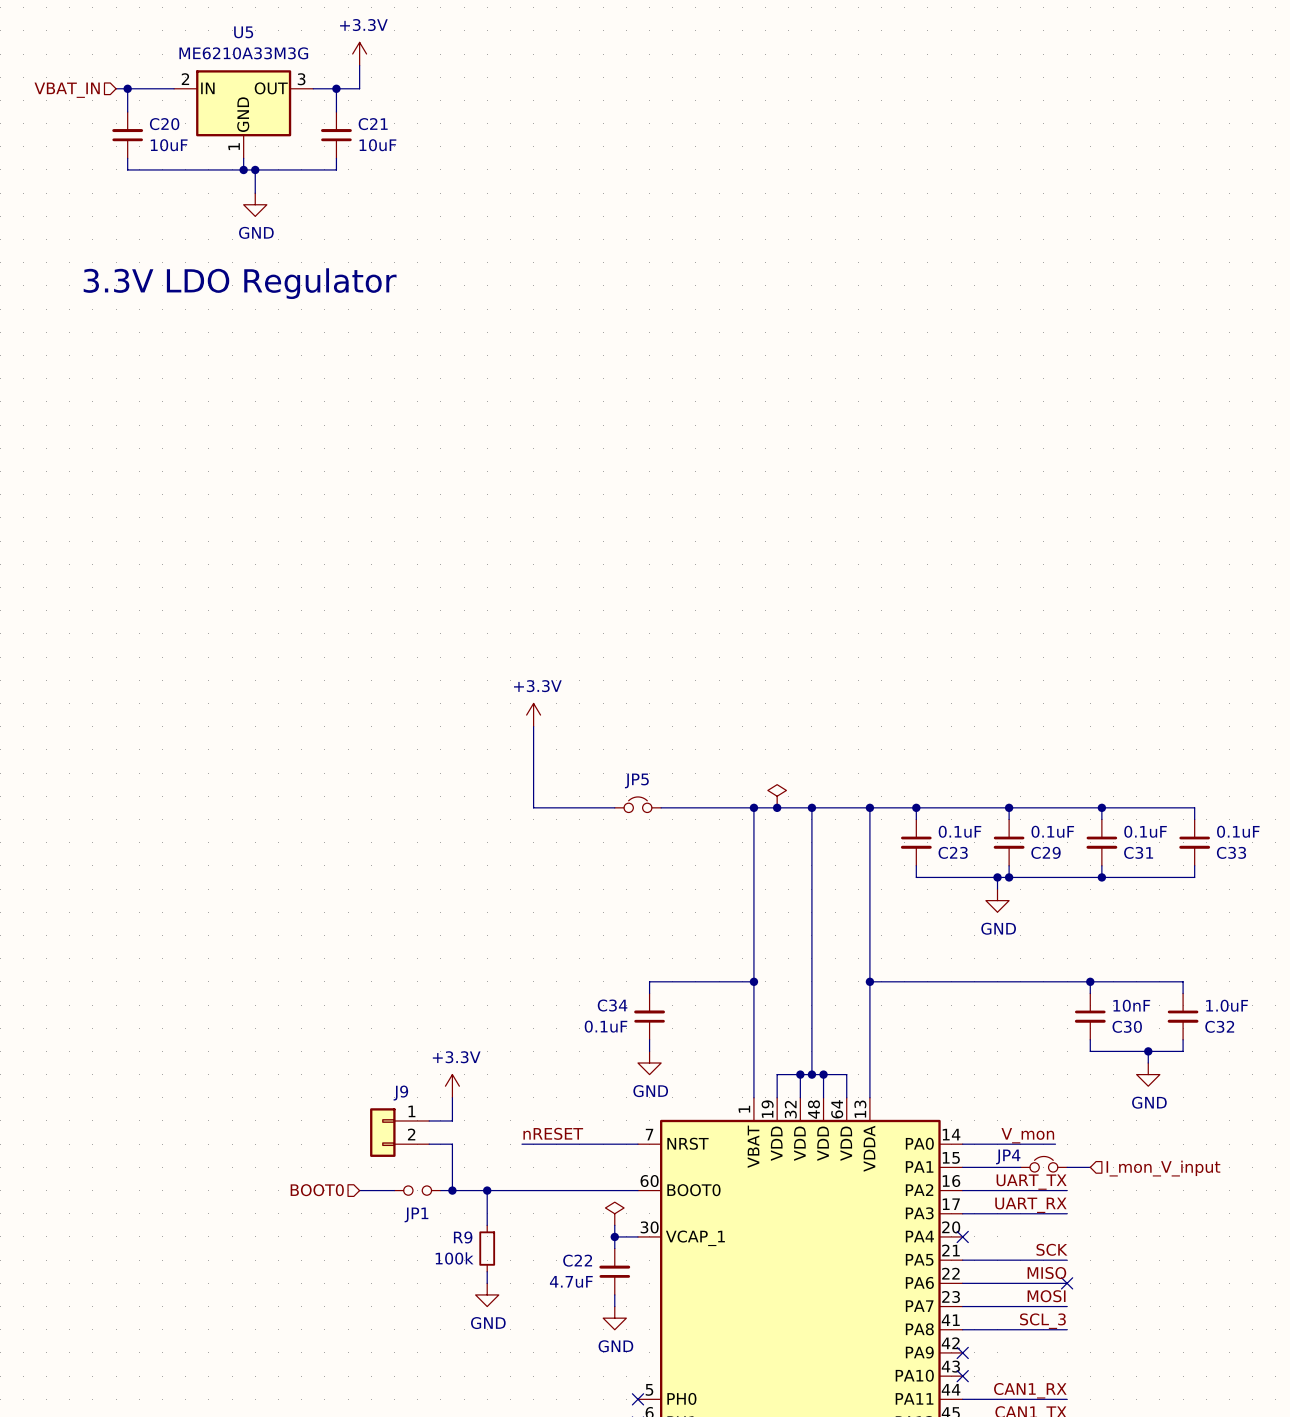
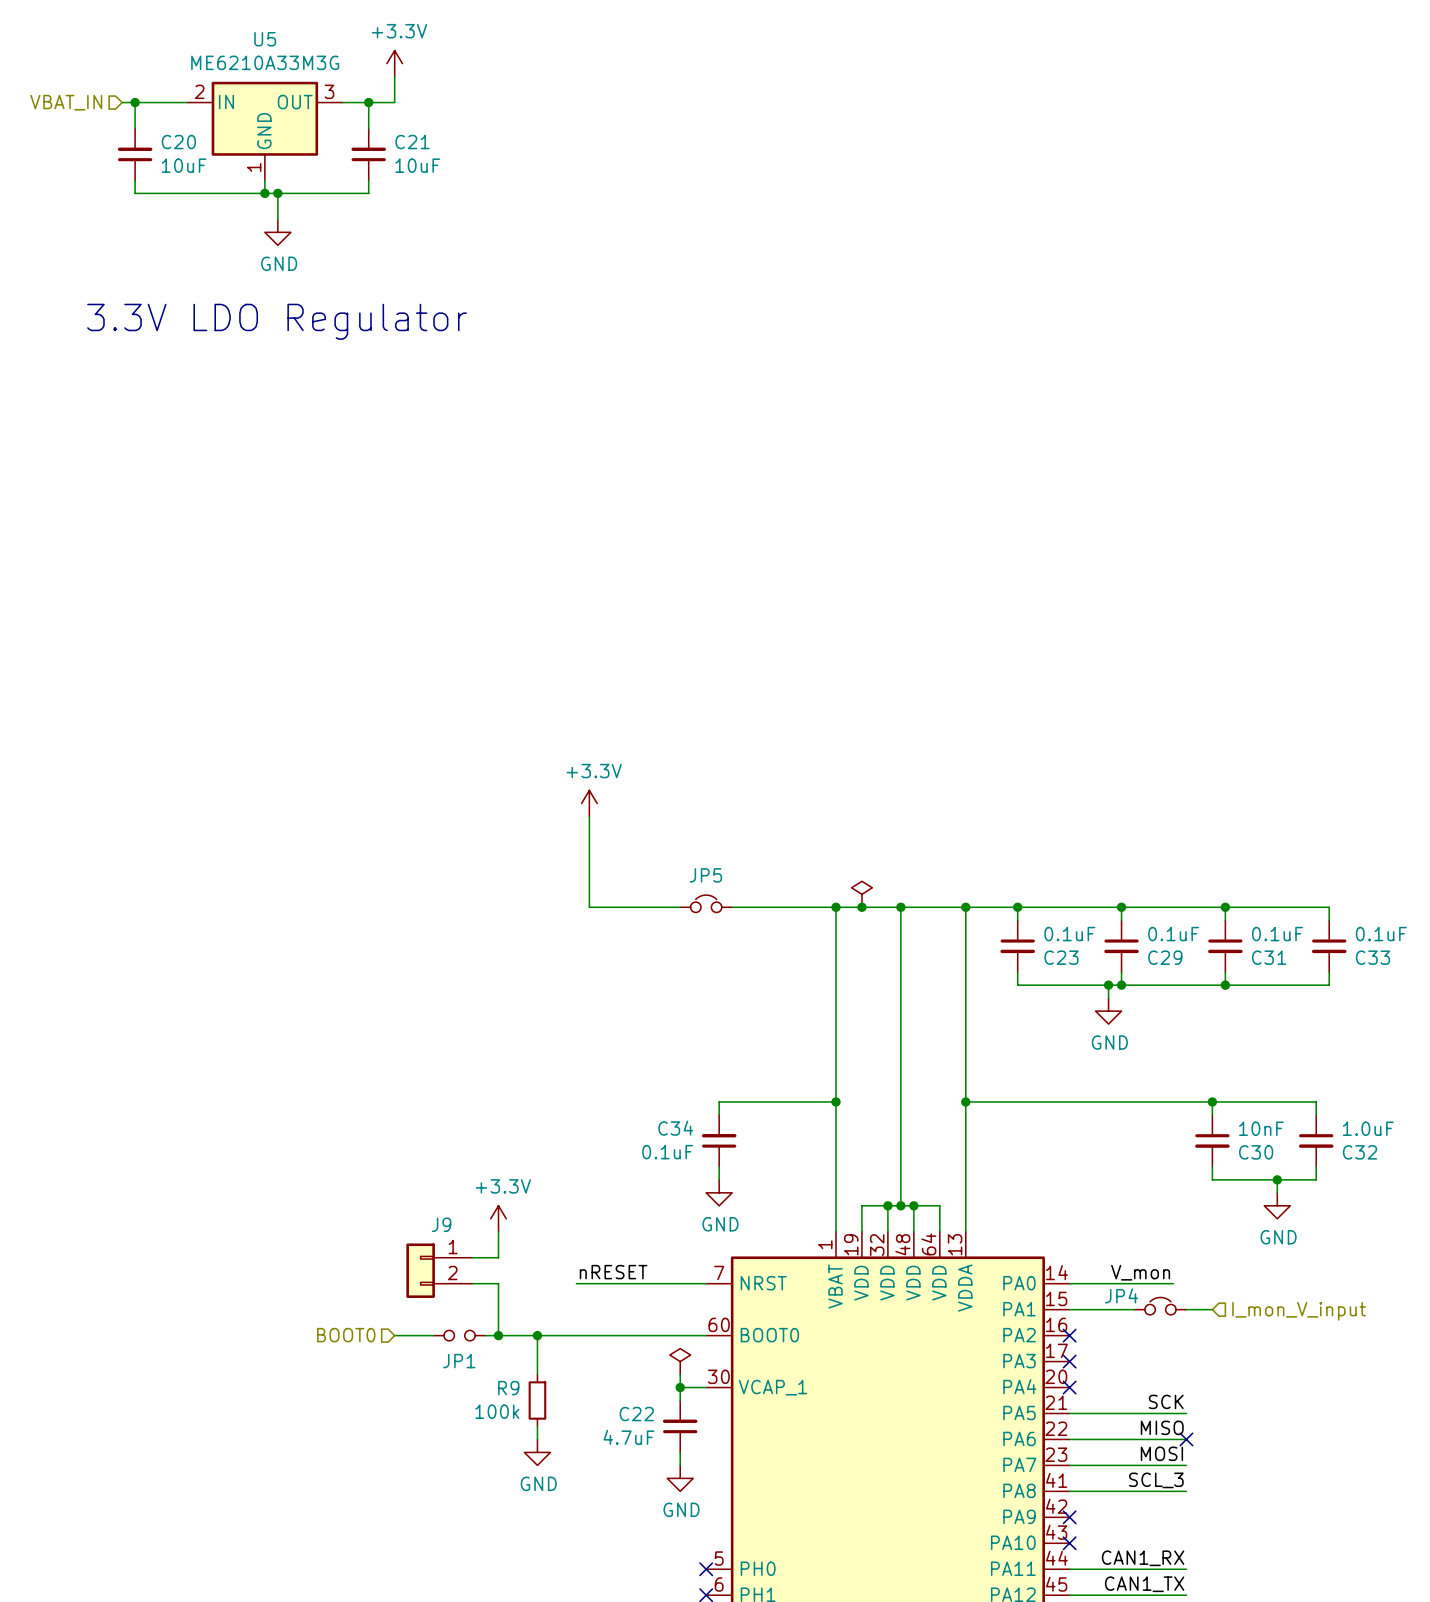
label: UART_TX (1031, 1182) -> none
wire: (962, 1190) (1067, 1190) -> none
no-connect mark: none -> (1069, 1335)
label: UART_RX (1030, 1205) -> none
wire: (962, 1213) (1067, 1213) -> none
no-connect mark: none -> (1069, 1361)

